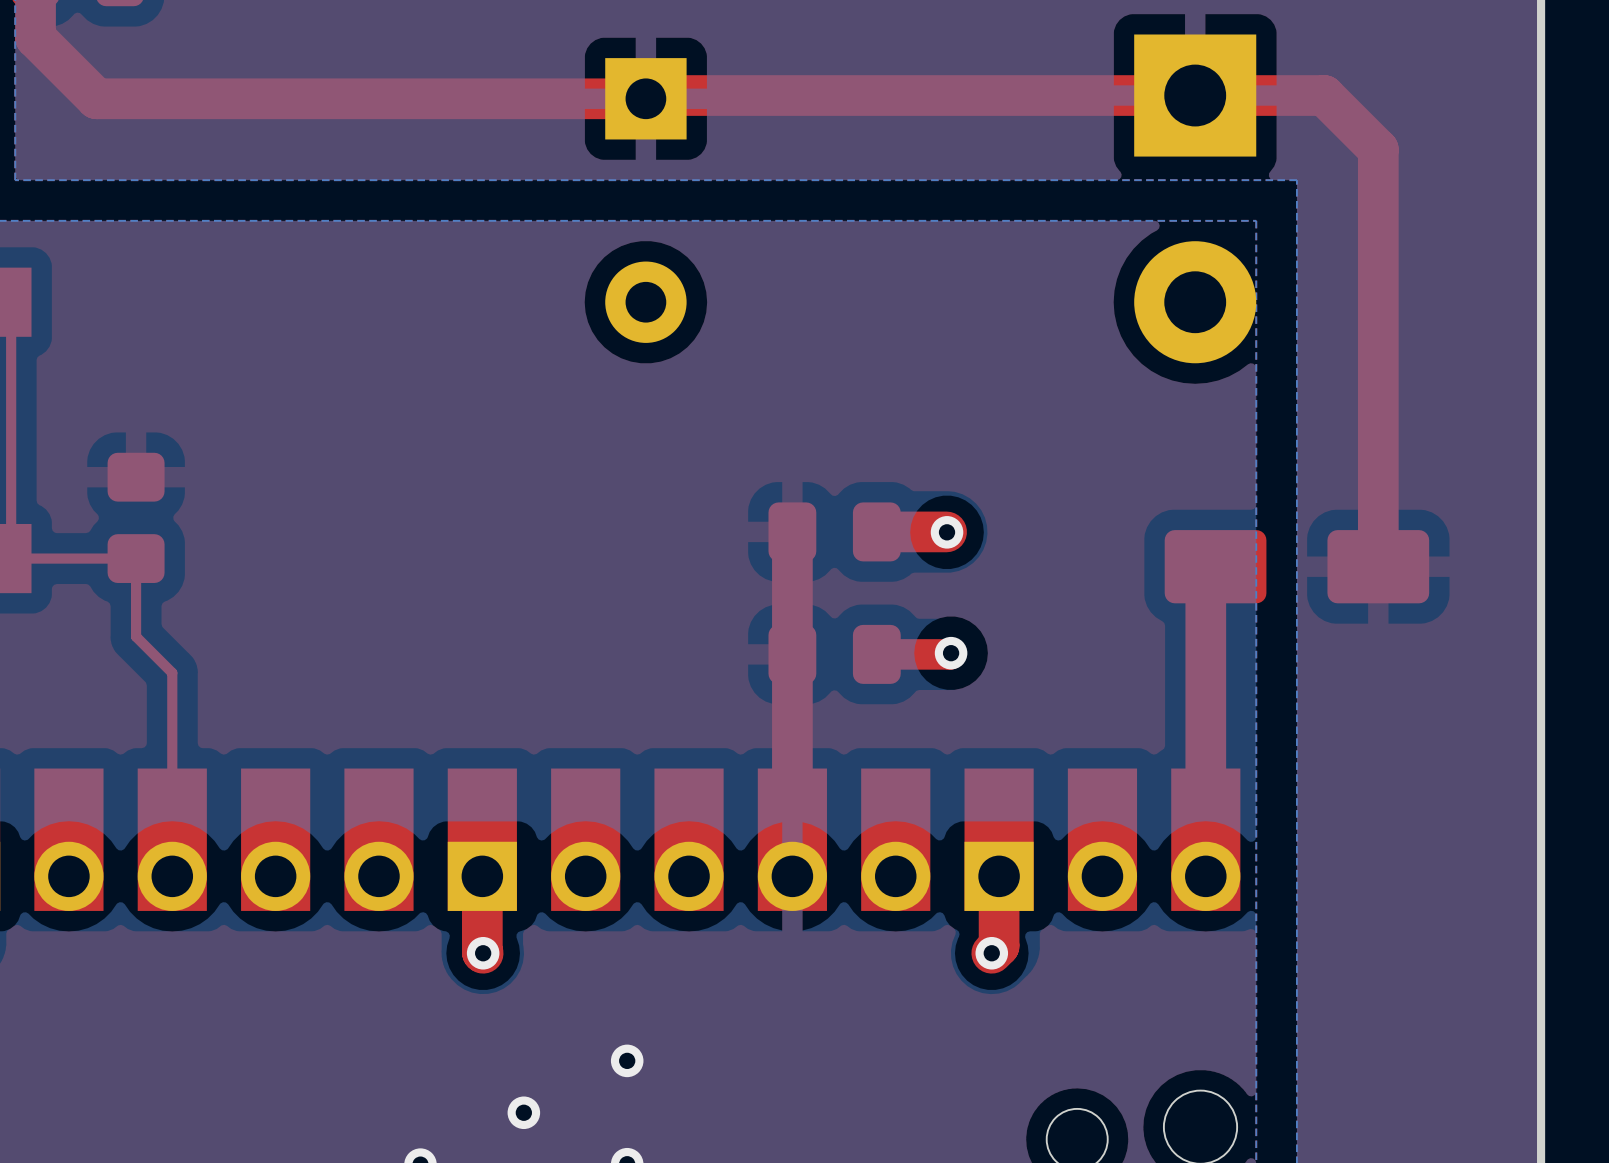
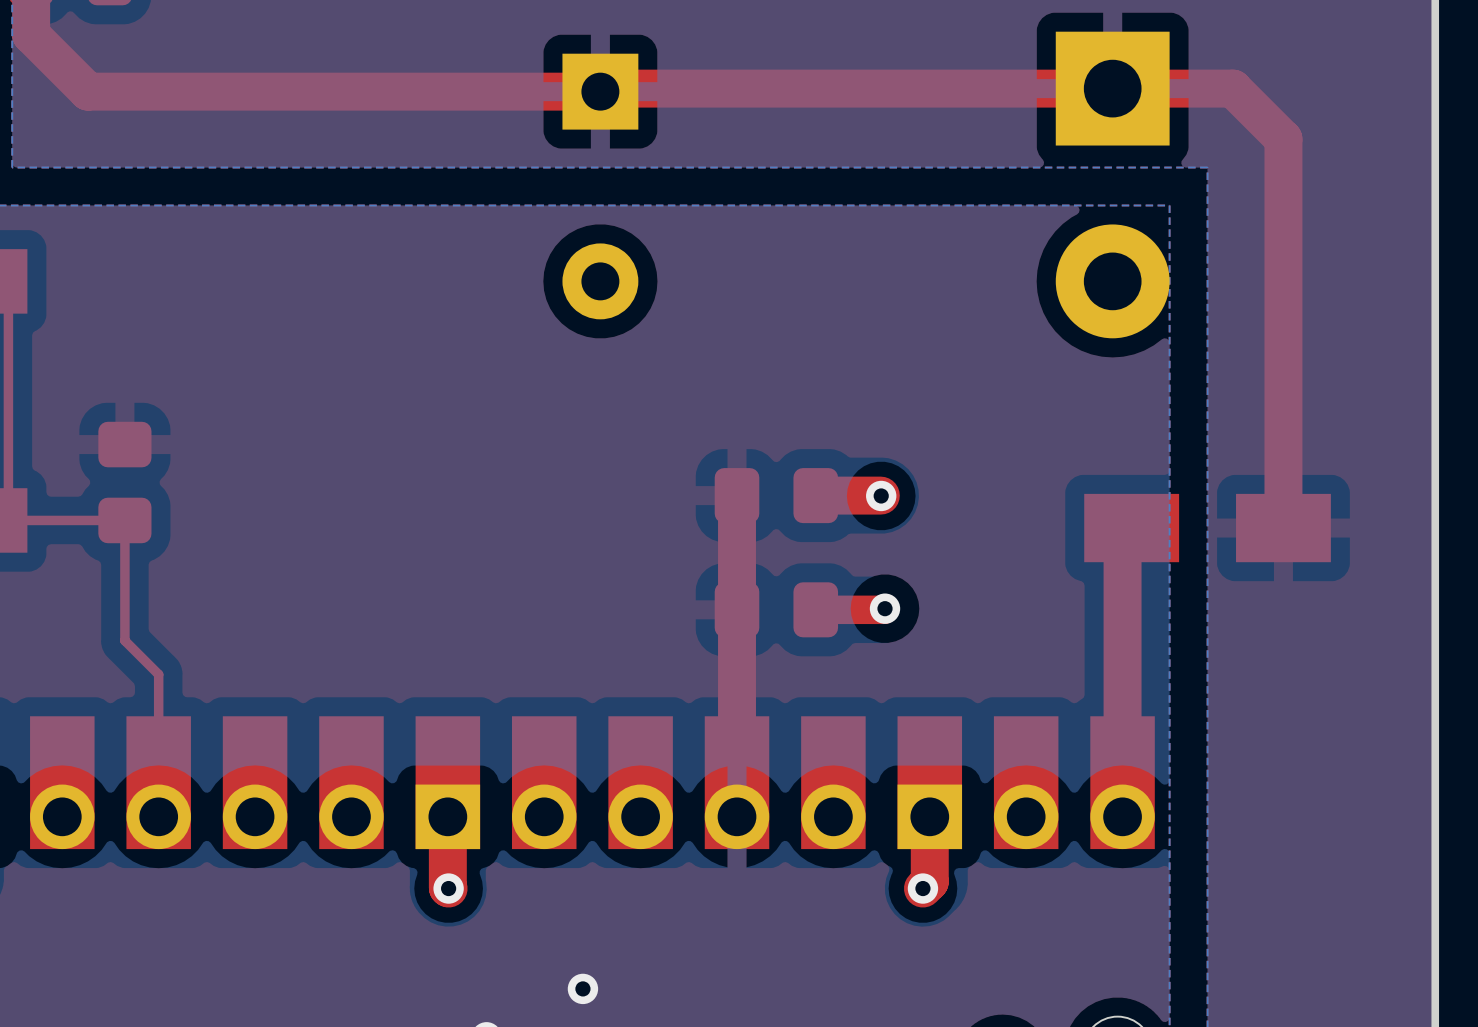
part footprint: [1164, 530, 1430, 604] -> [1084, 493, 1331, 563]
top track: (136, 636) (172, 672) (172, 723) -> (124, 593) (124, 640) (158, 674)

